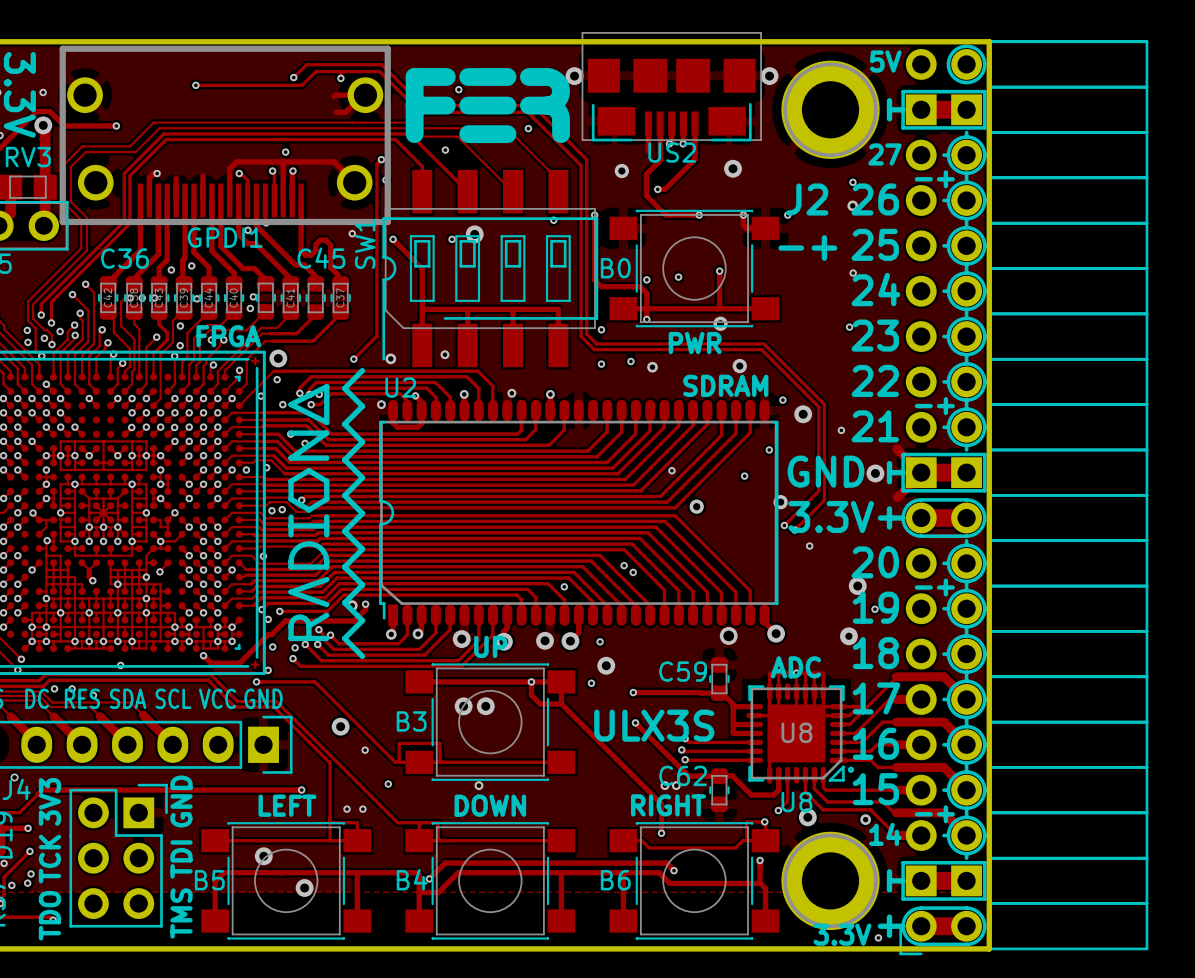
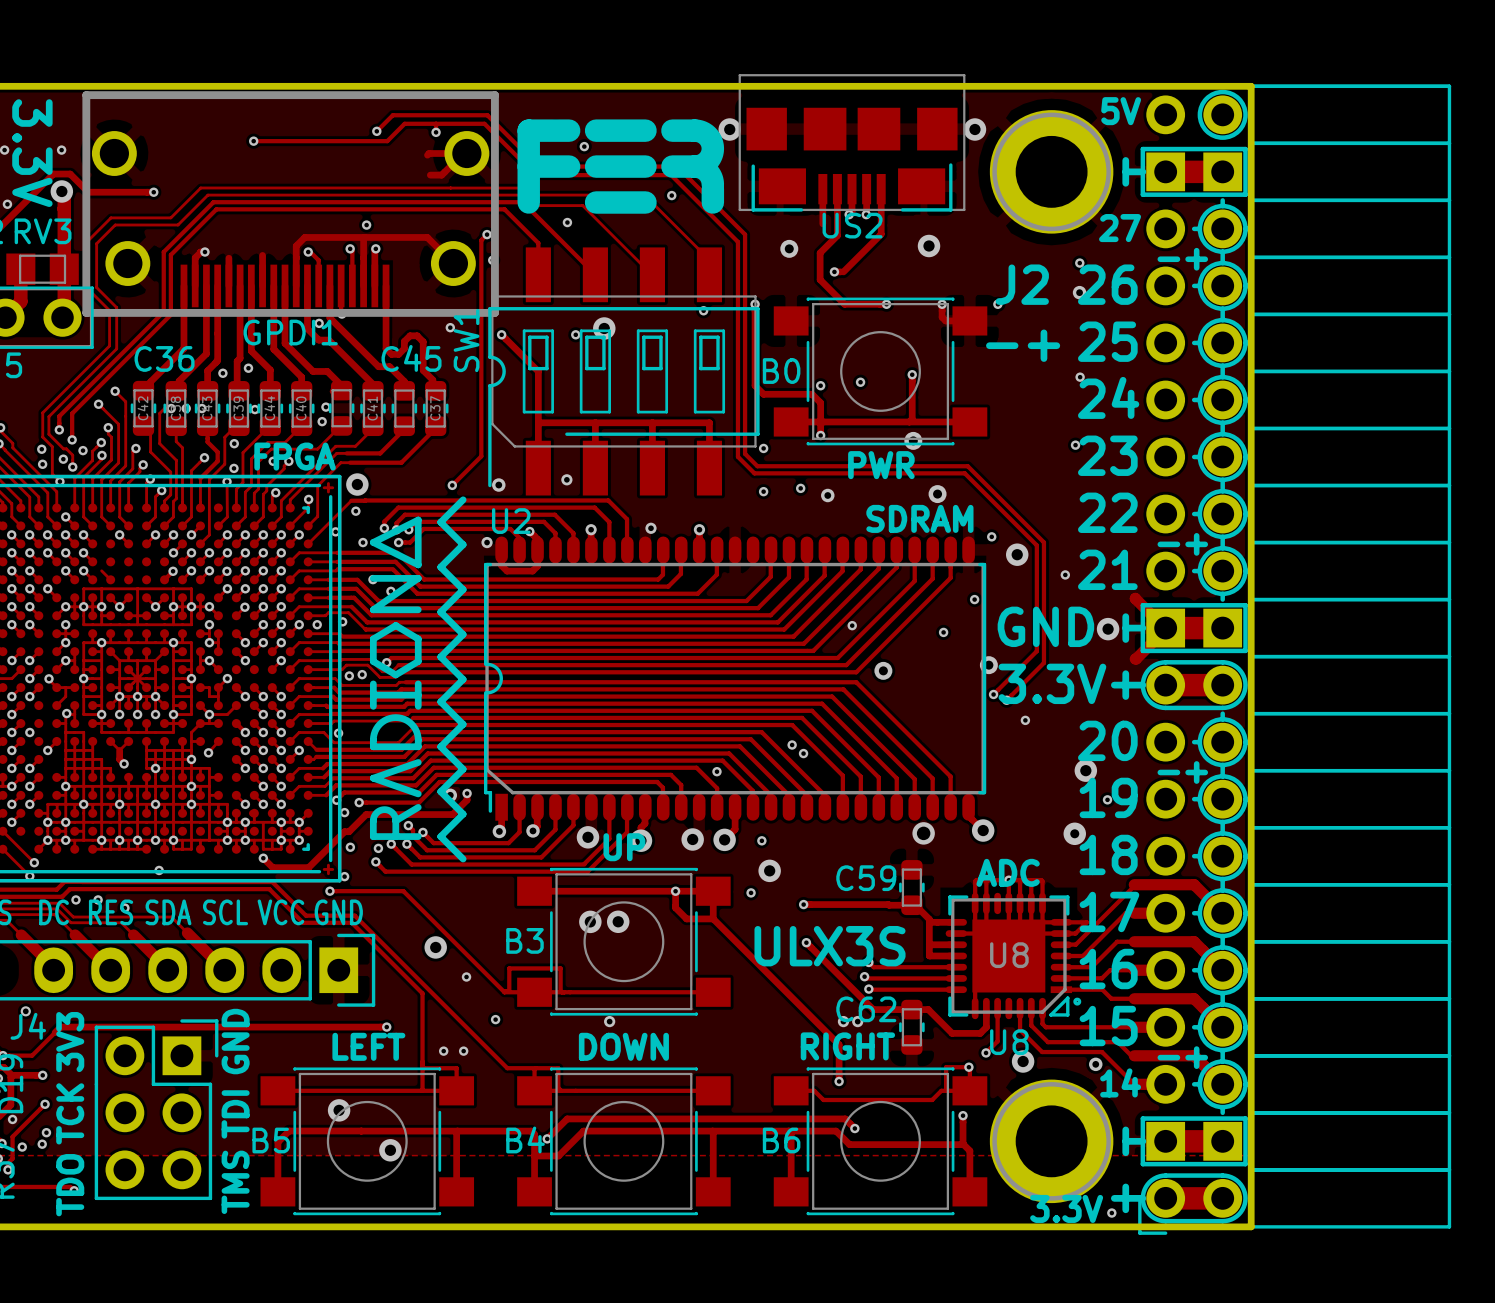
via: (74, 427) -> none

